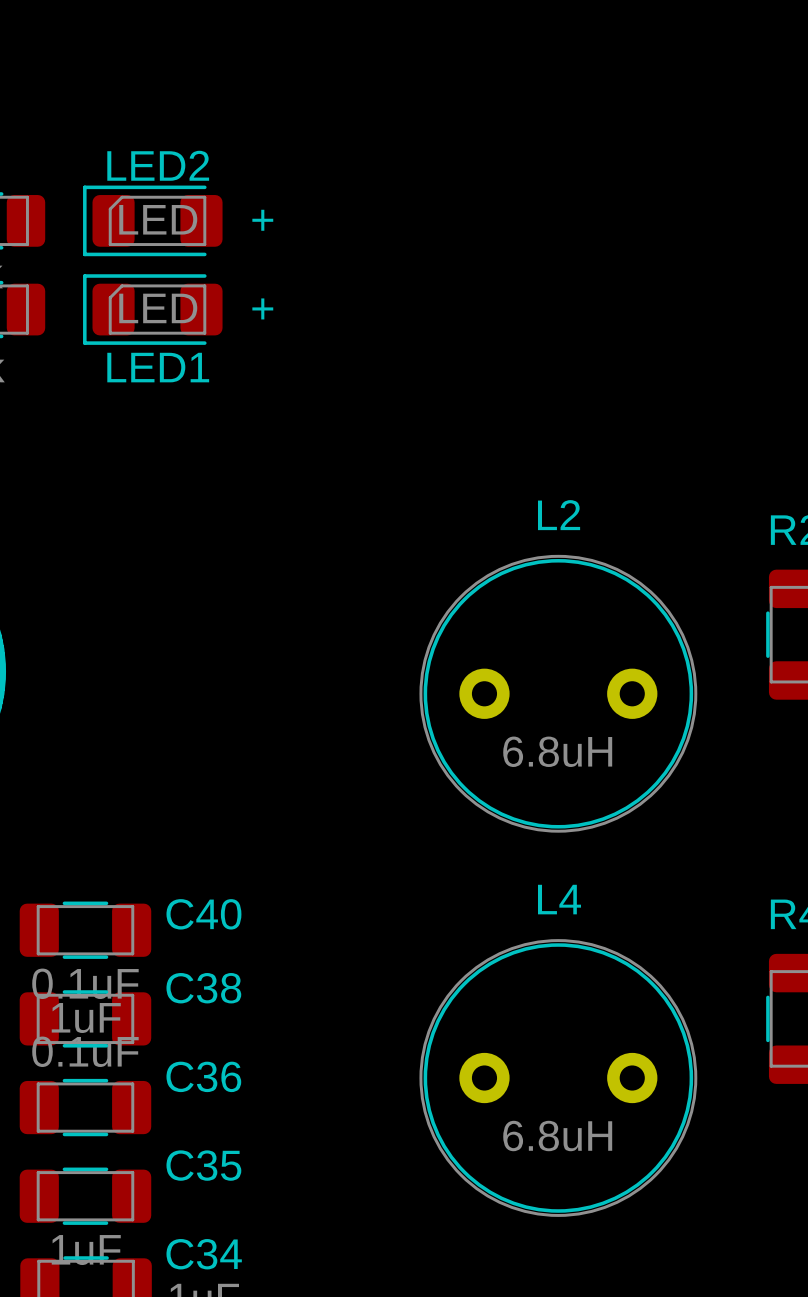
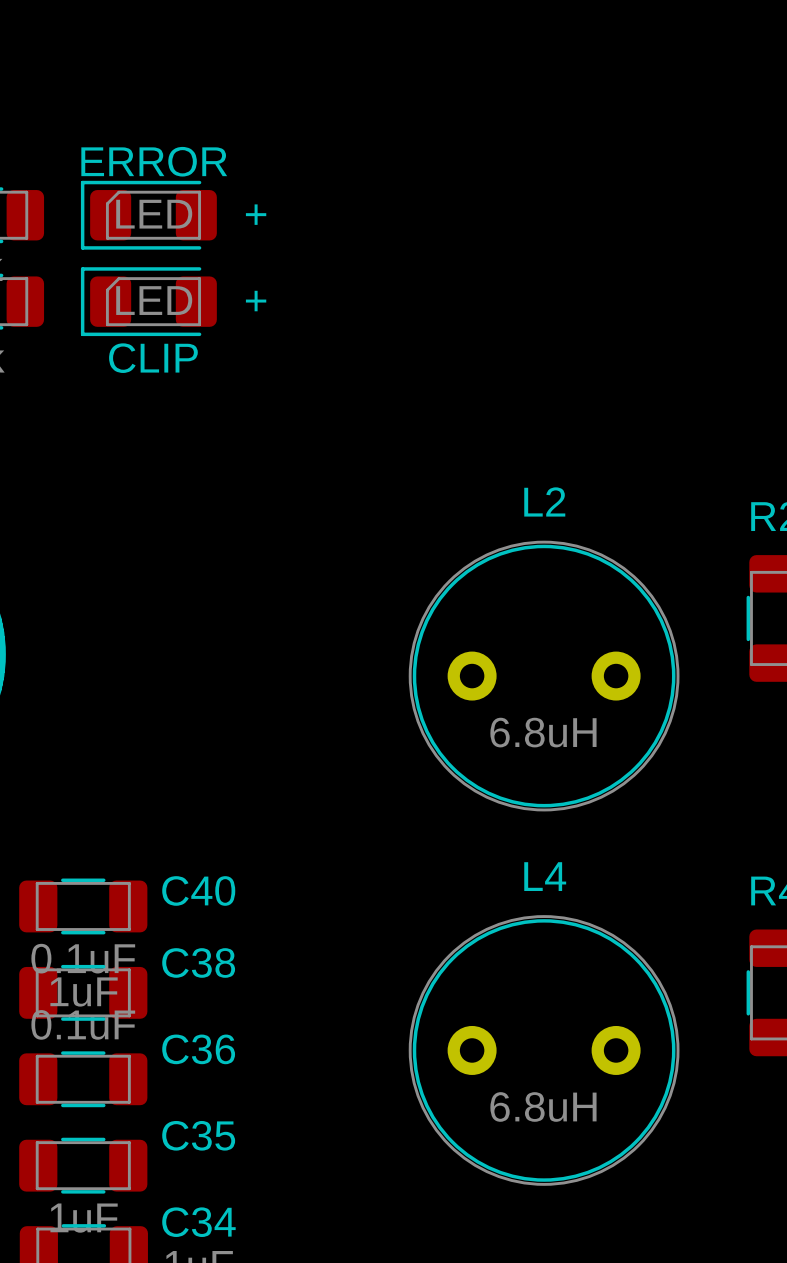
LED2 name: LED2 (158, 165) -> ERROR (154, 161)
LED1 name: LED1 (158, 367) -> CLIP (153, 358)

